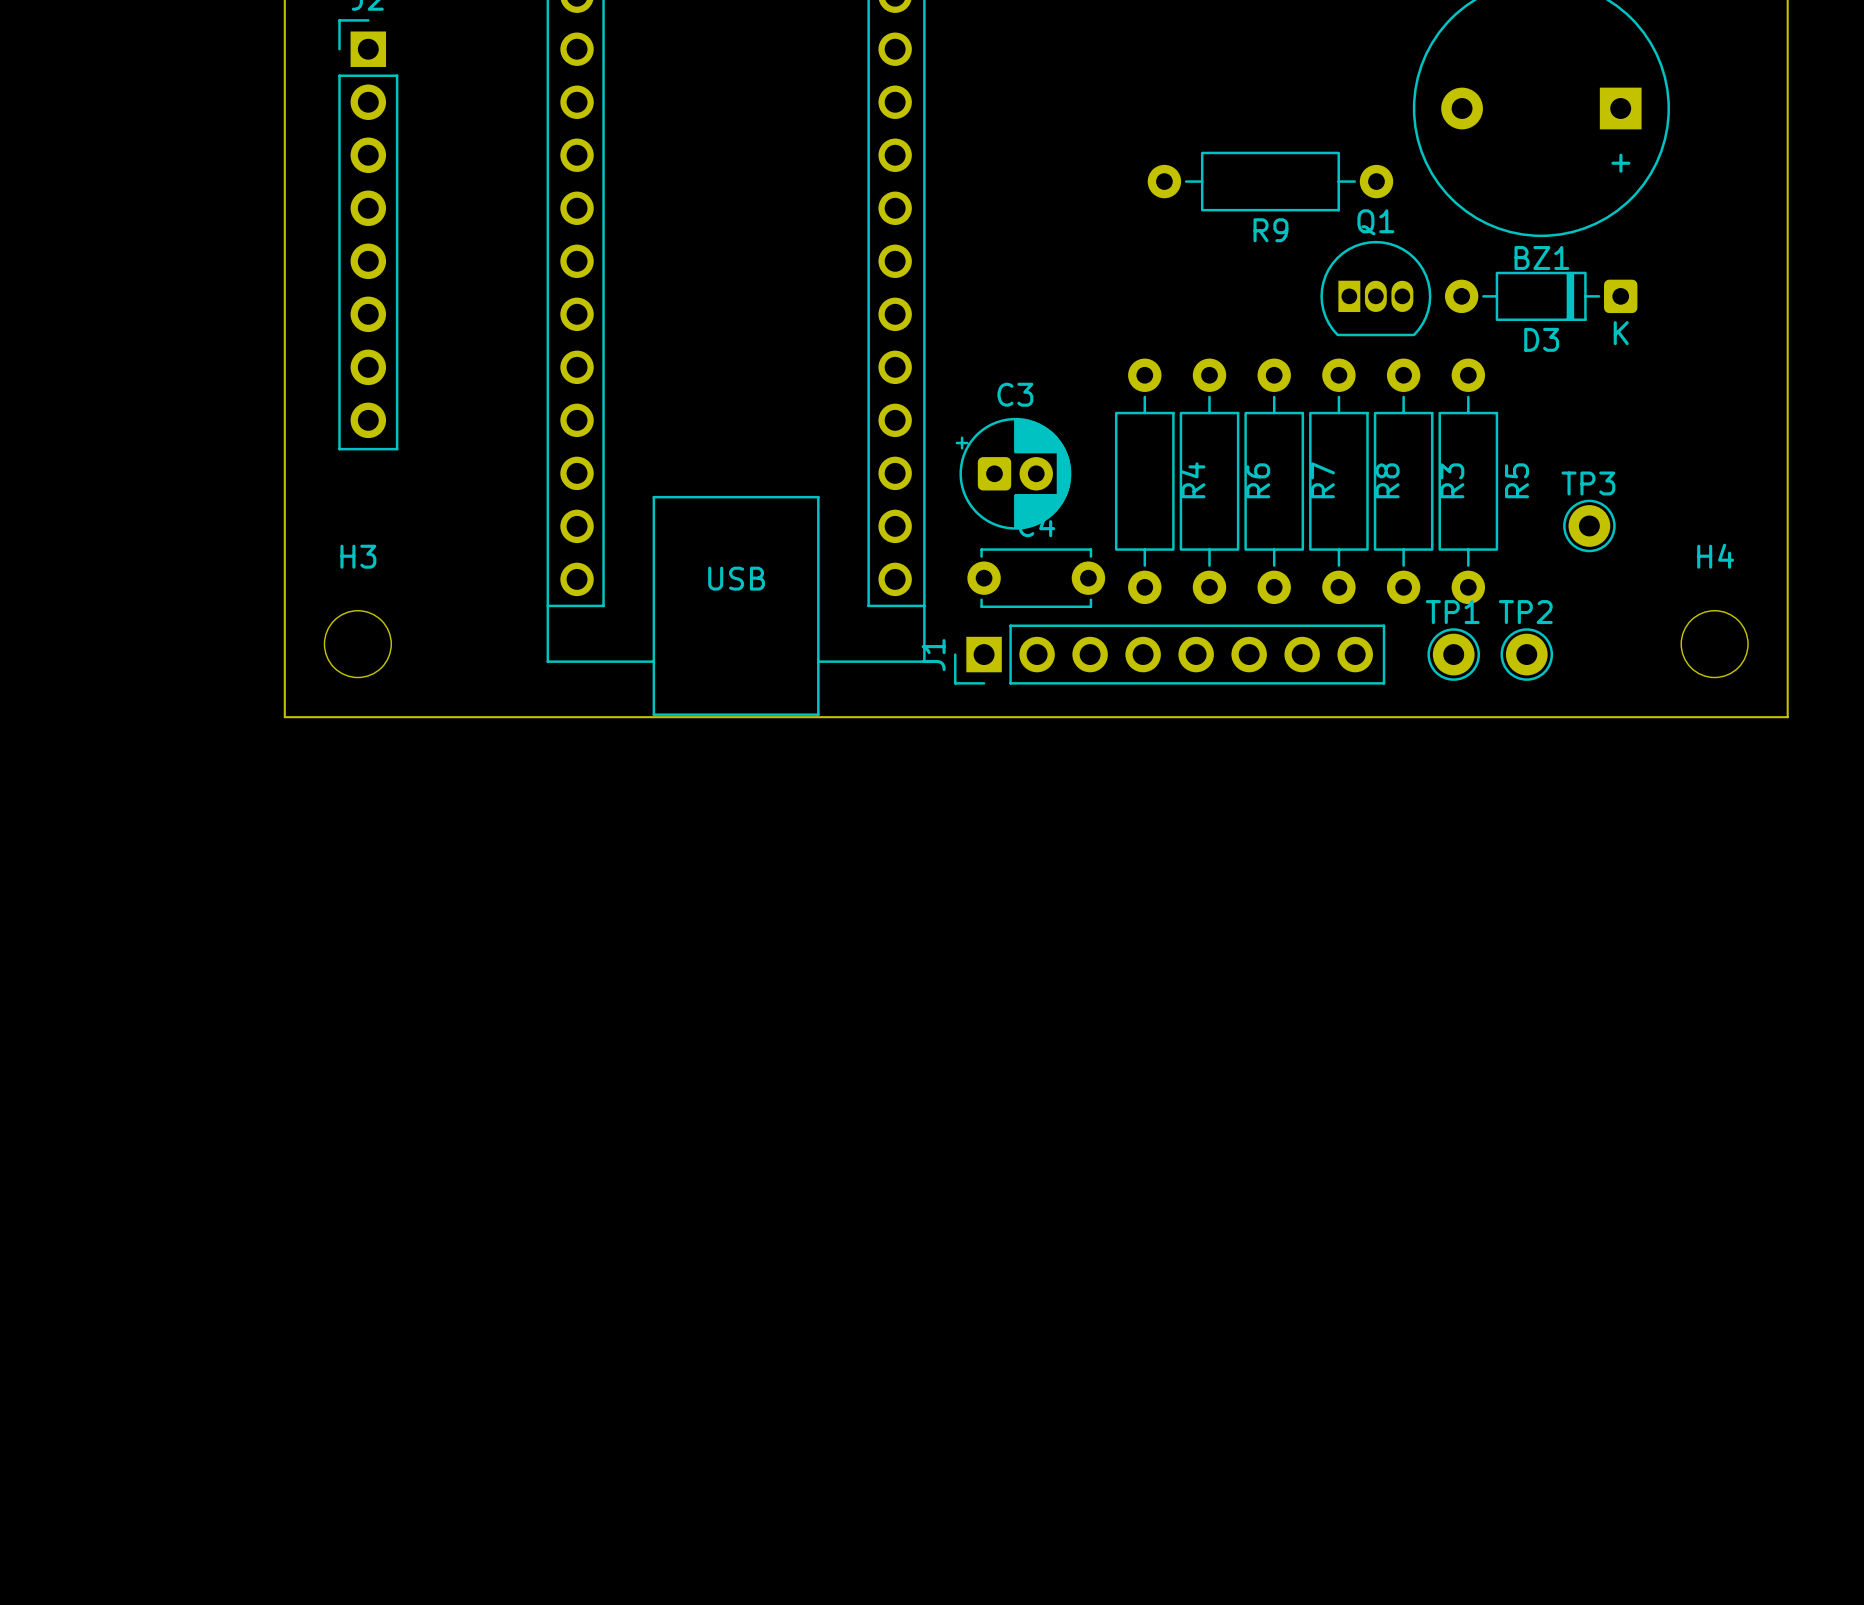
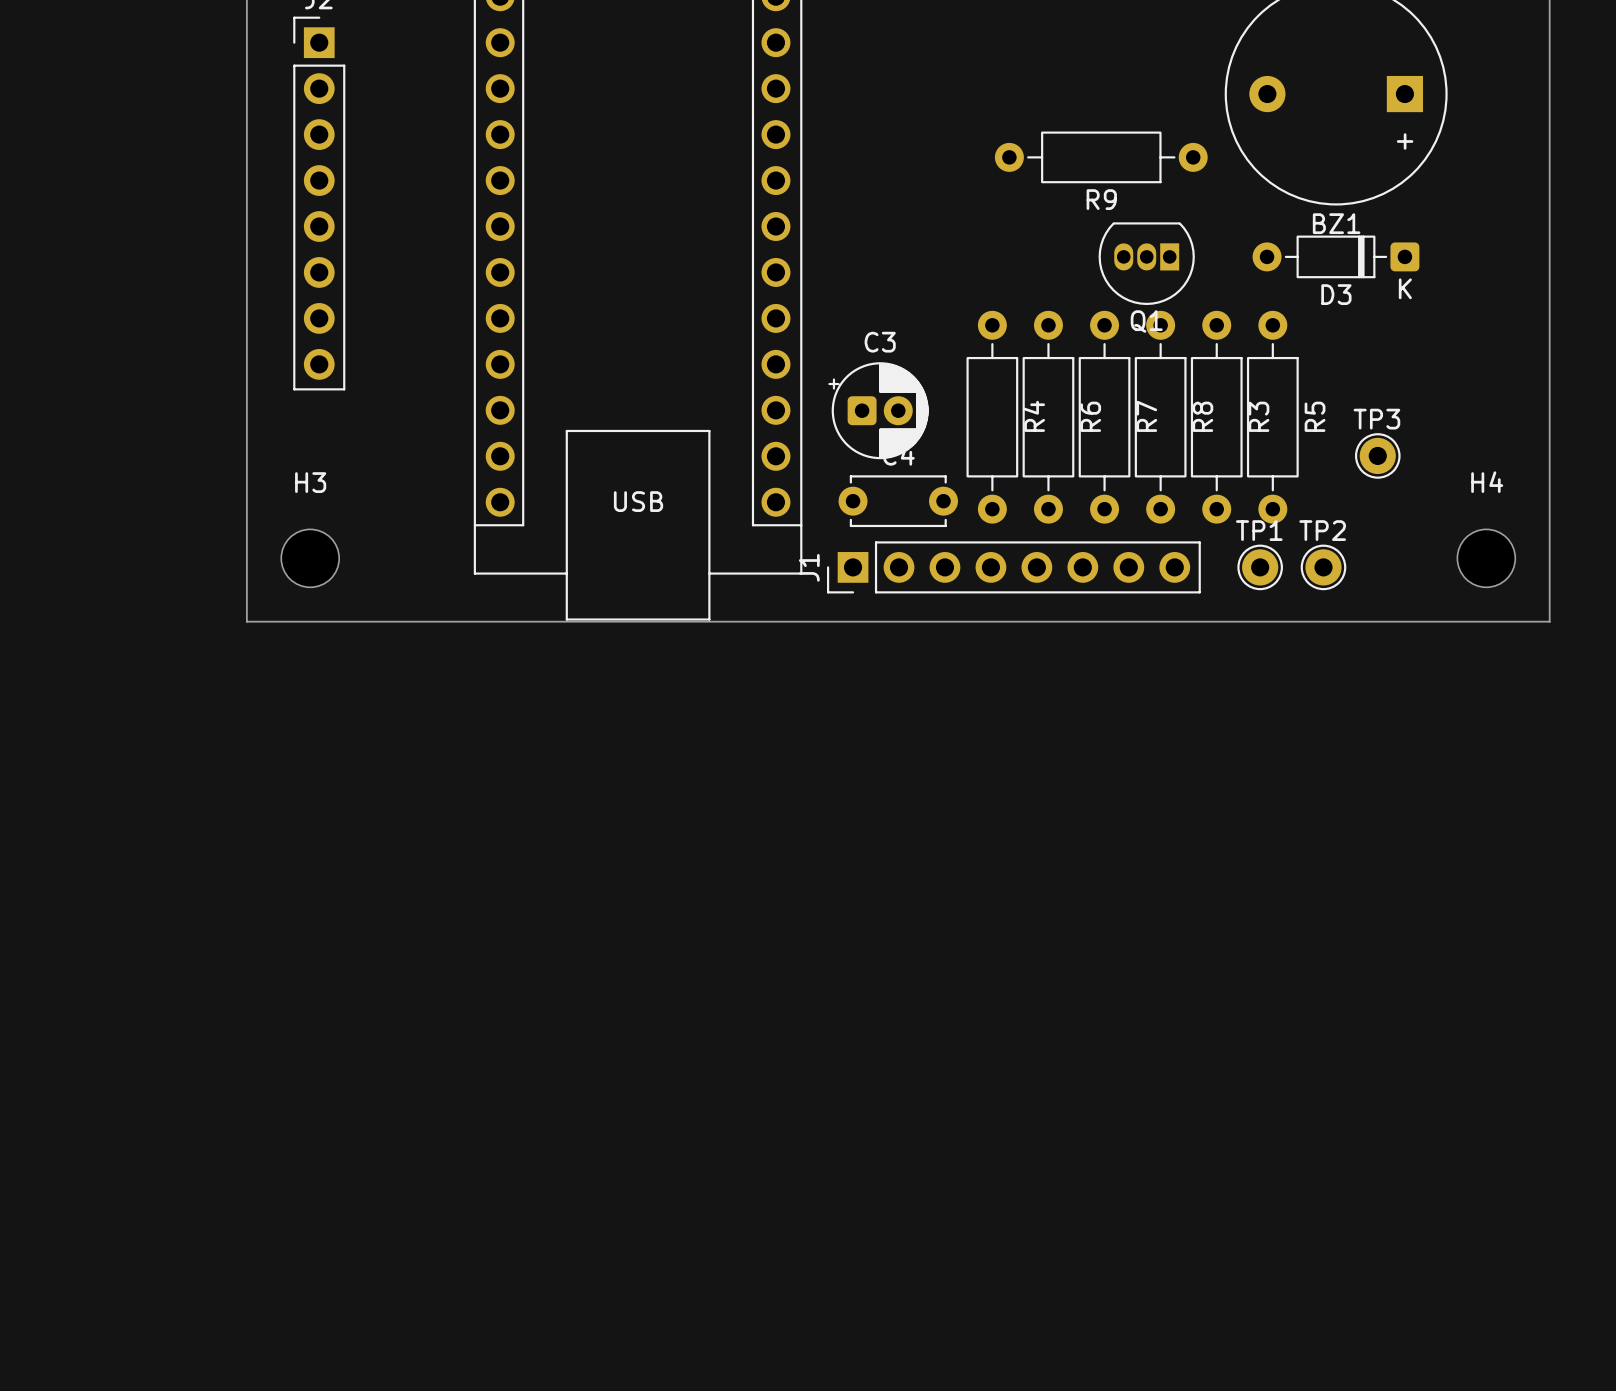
Q1 rotation: 0° (1375, 288) -> 180° (1146, 263)

